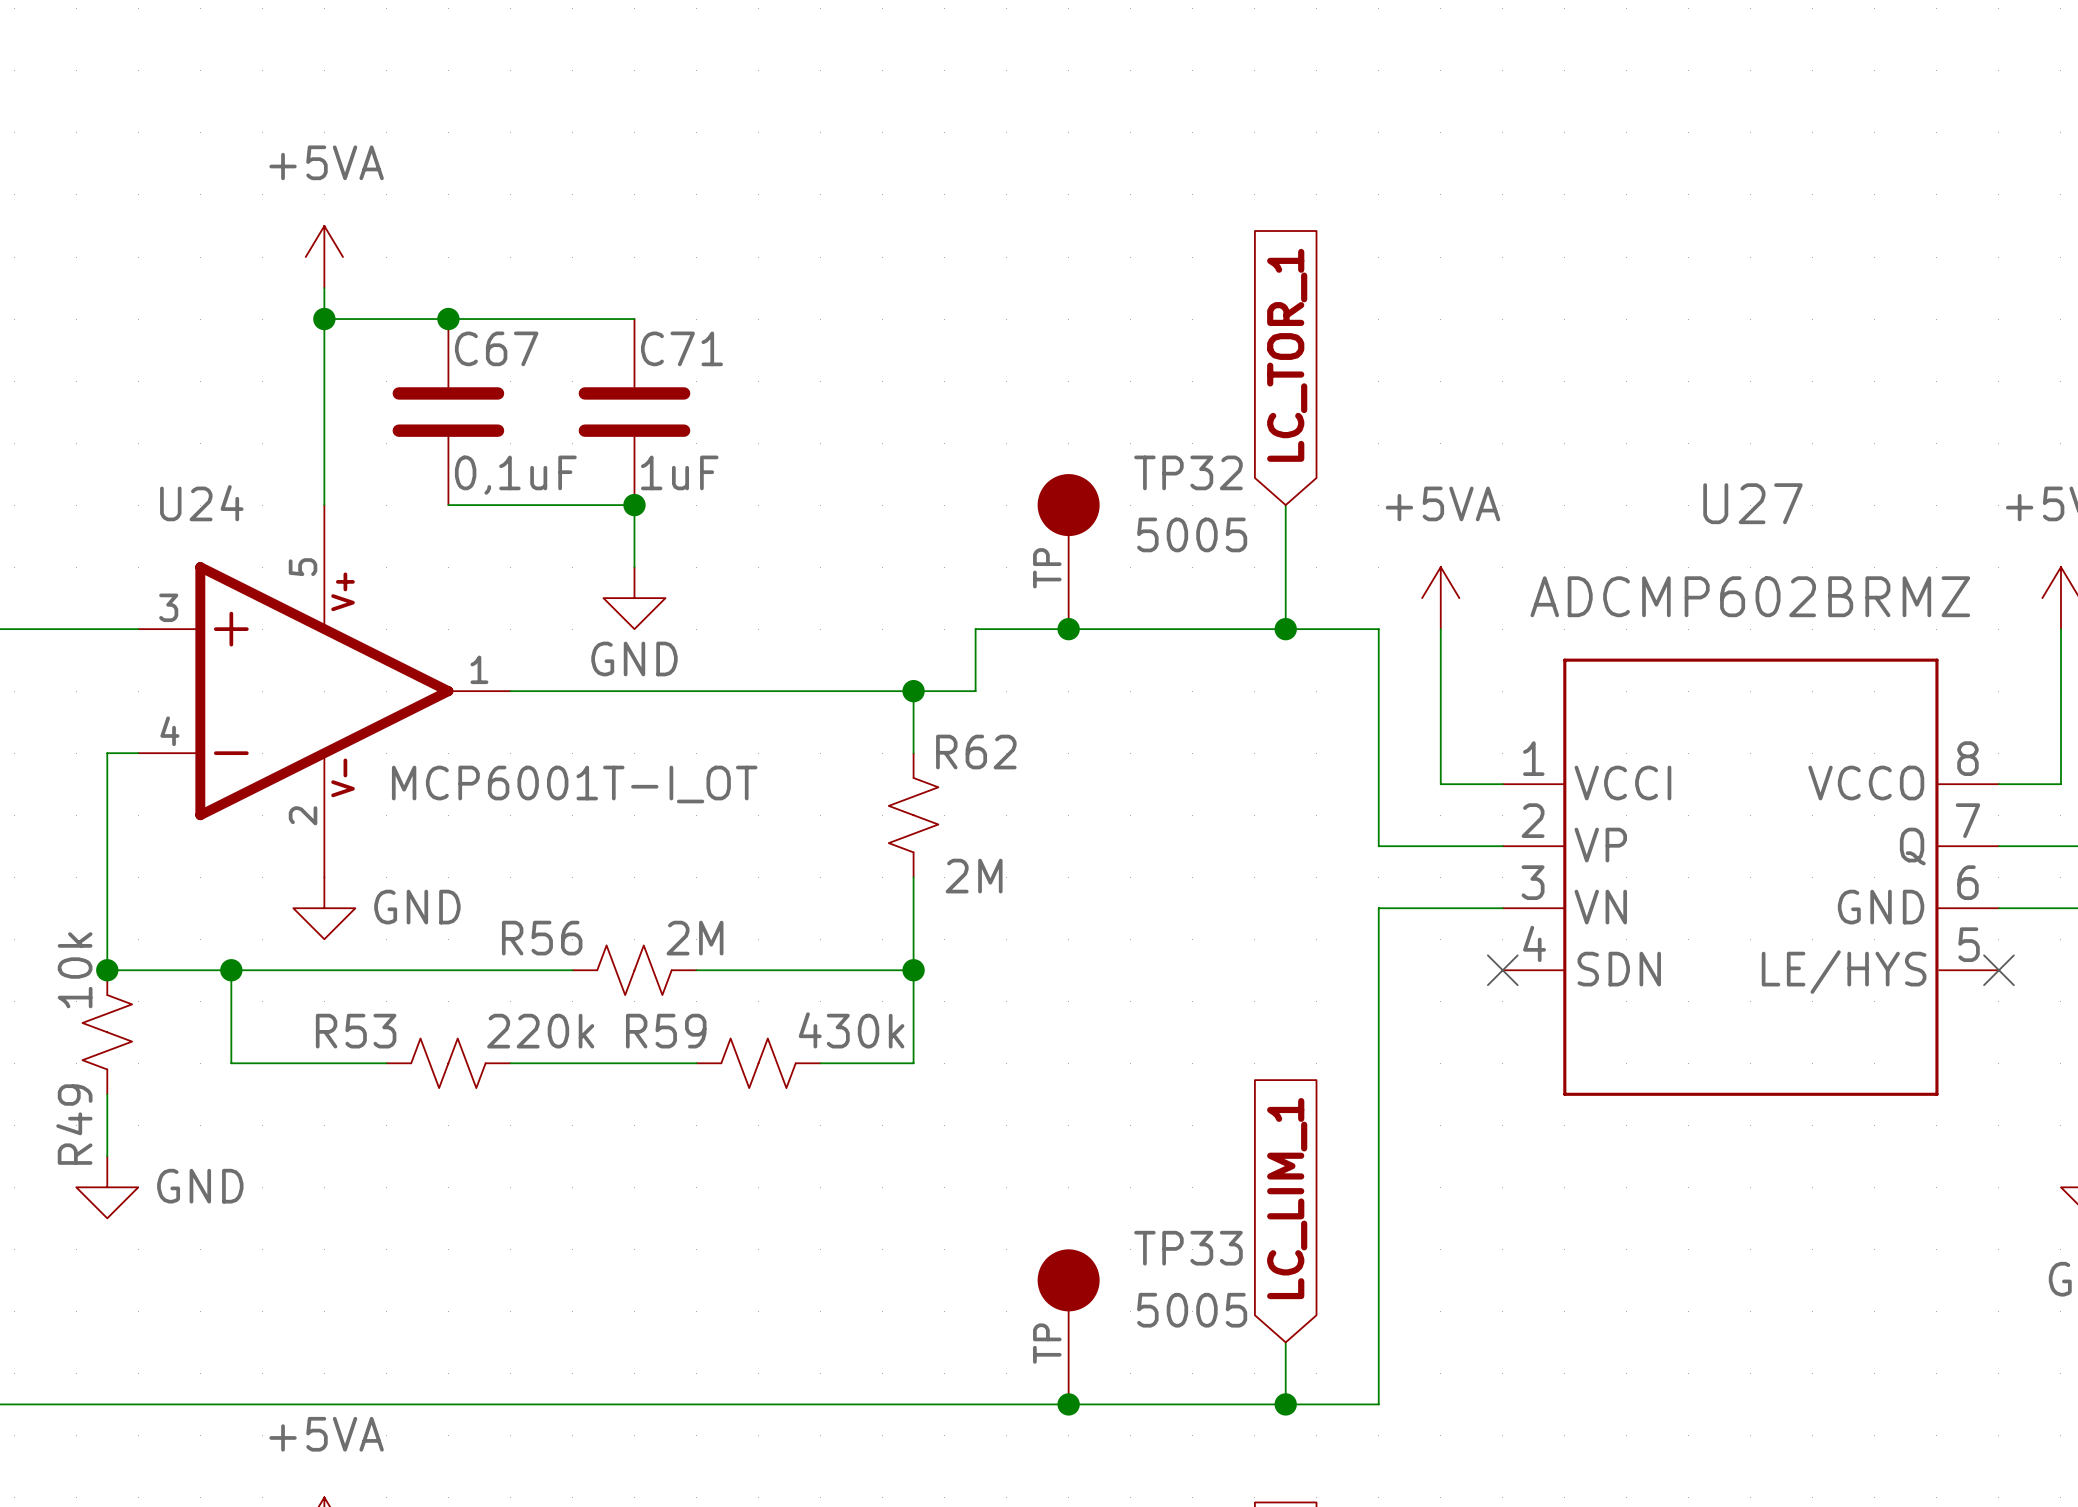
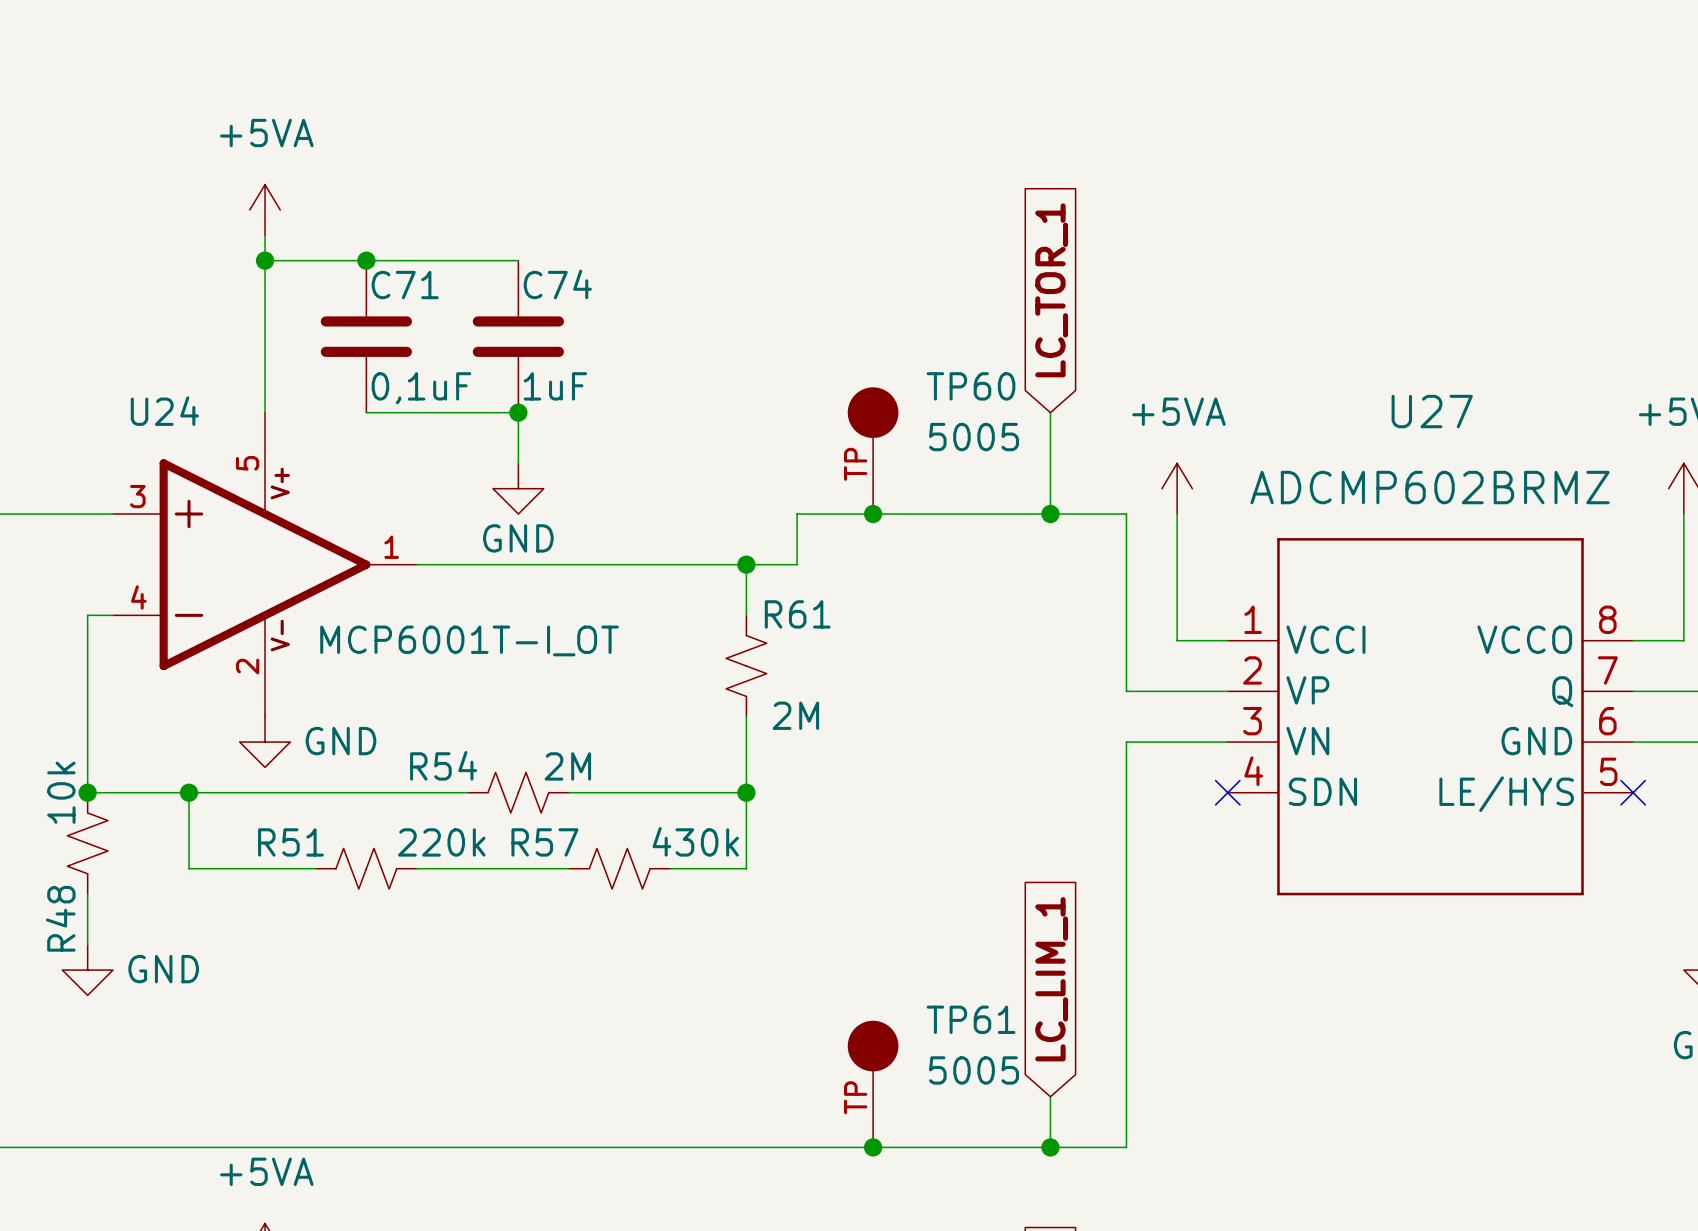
C67 name: C67 (496, 348) -> C71 (405, 285)
C71 name: C71 (681, 348) -> C74 (557, 284)
TP32 name: TP32 (1188, 472) -> TP60 (971, 386)
R62 name: R62 (976, 752) -> R61 (797, 614)
R56 name: R56 (542, 938) -> R54 (443, 765)
R53 name: R53 (356, 1031) -> R51 (290, 842)
R59 name: R59 (666, 1031) -> R57 (544, 842)
R49 name: R49 (74, 1124) -> R48 (60, 918)
TP33 name: TP33 (1188, 1248) -> TP61 (971, 1019)

